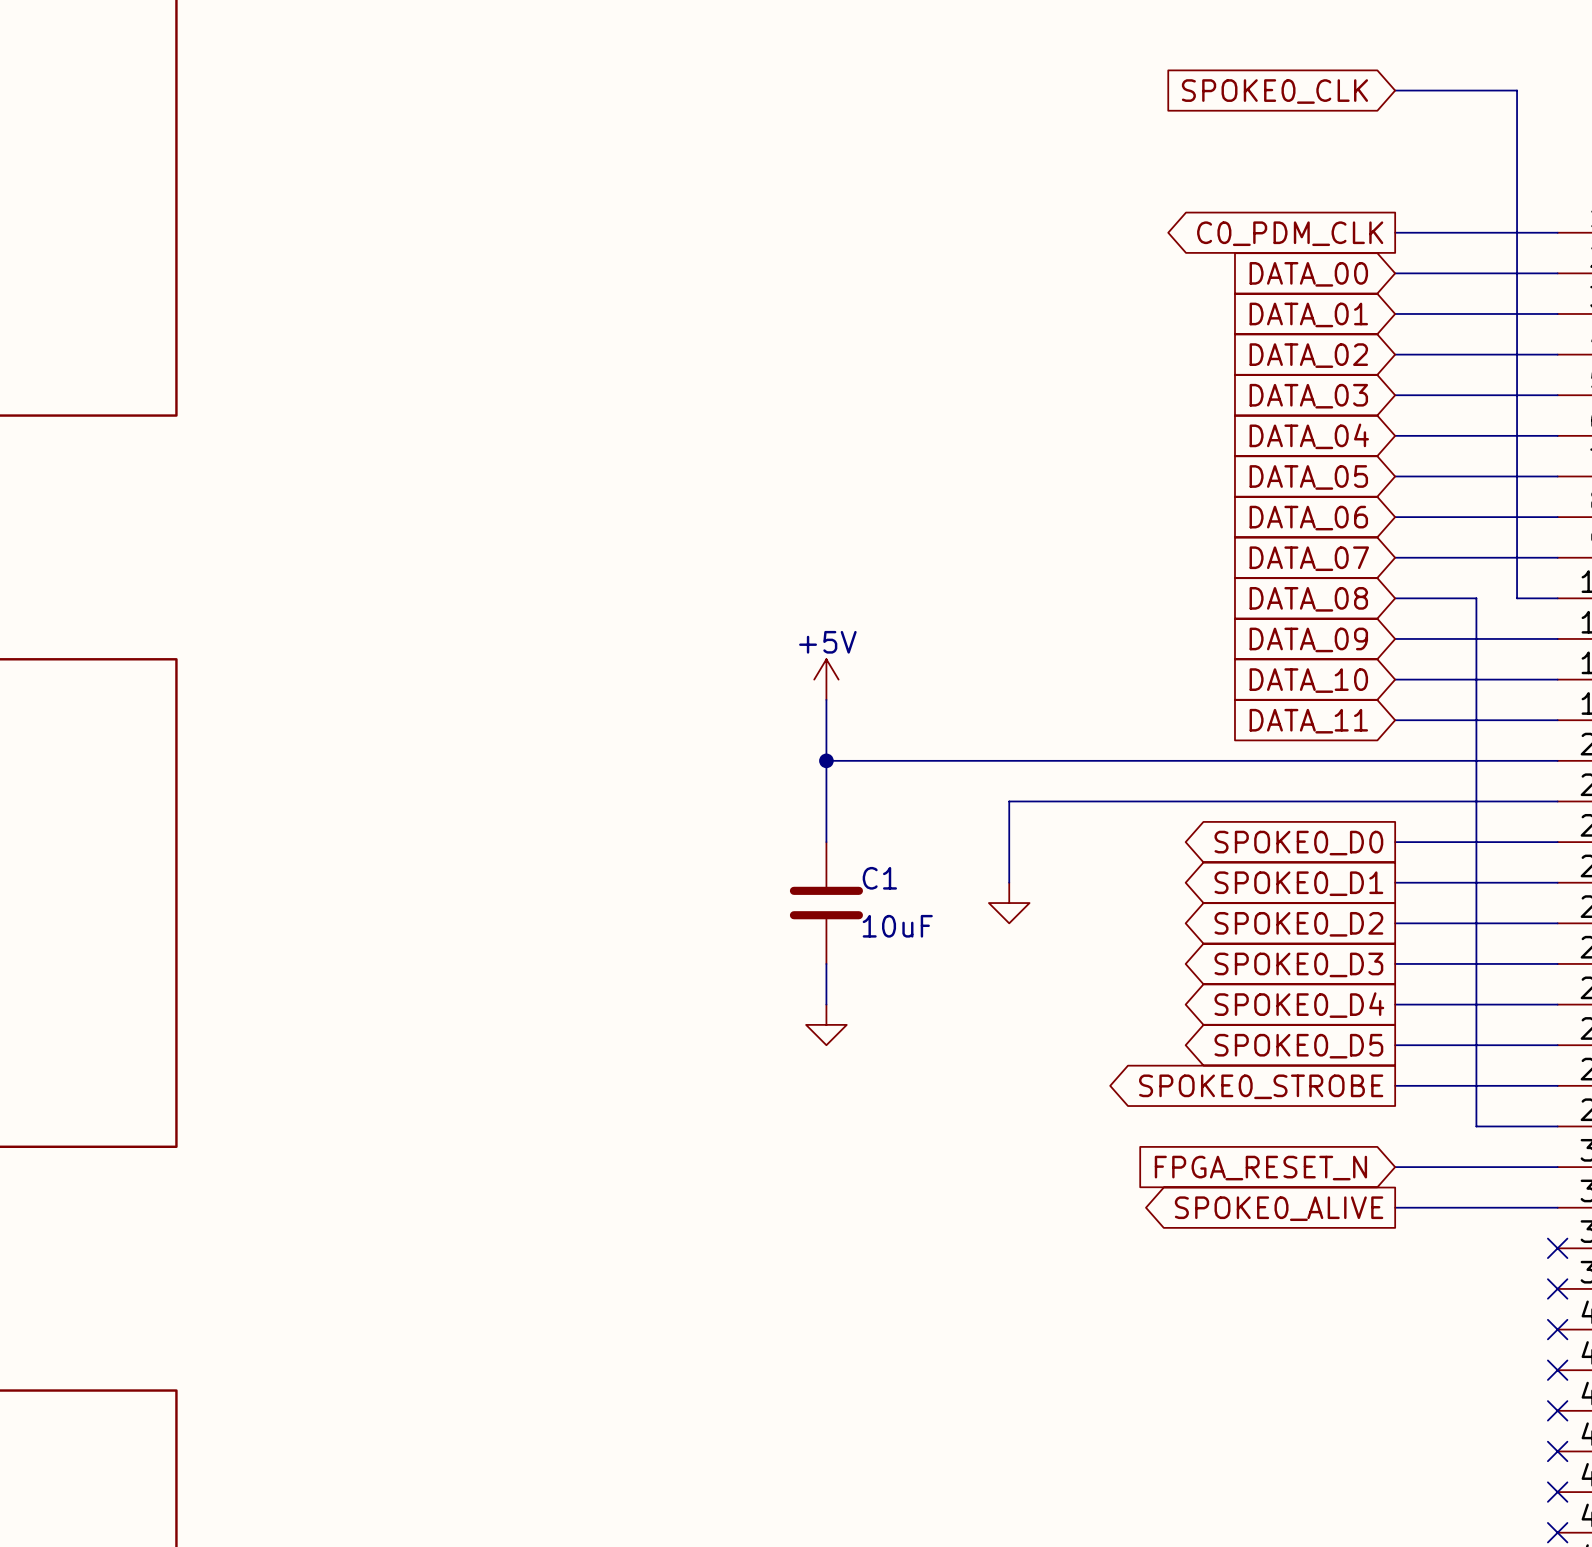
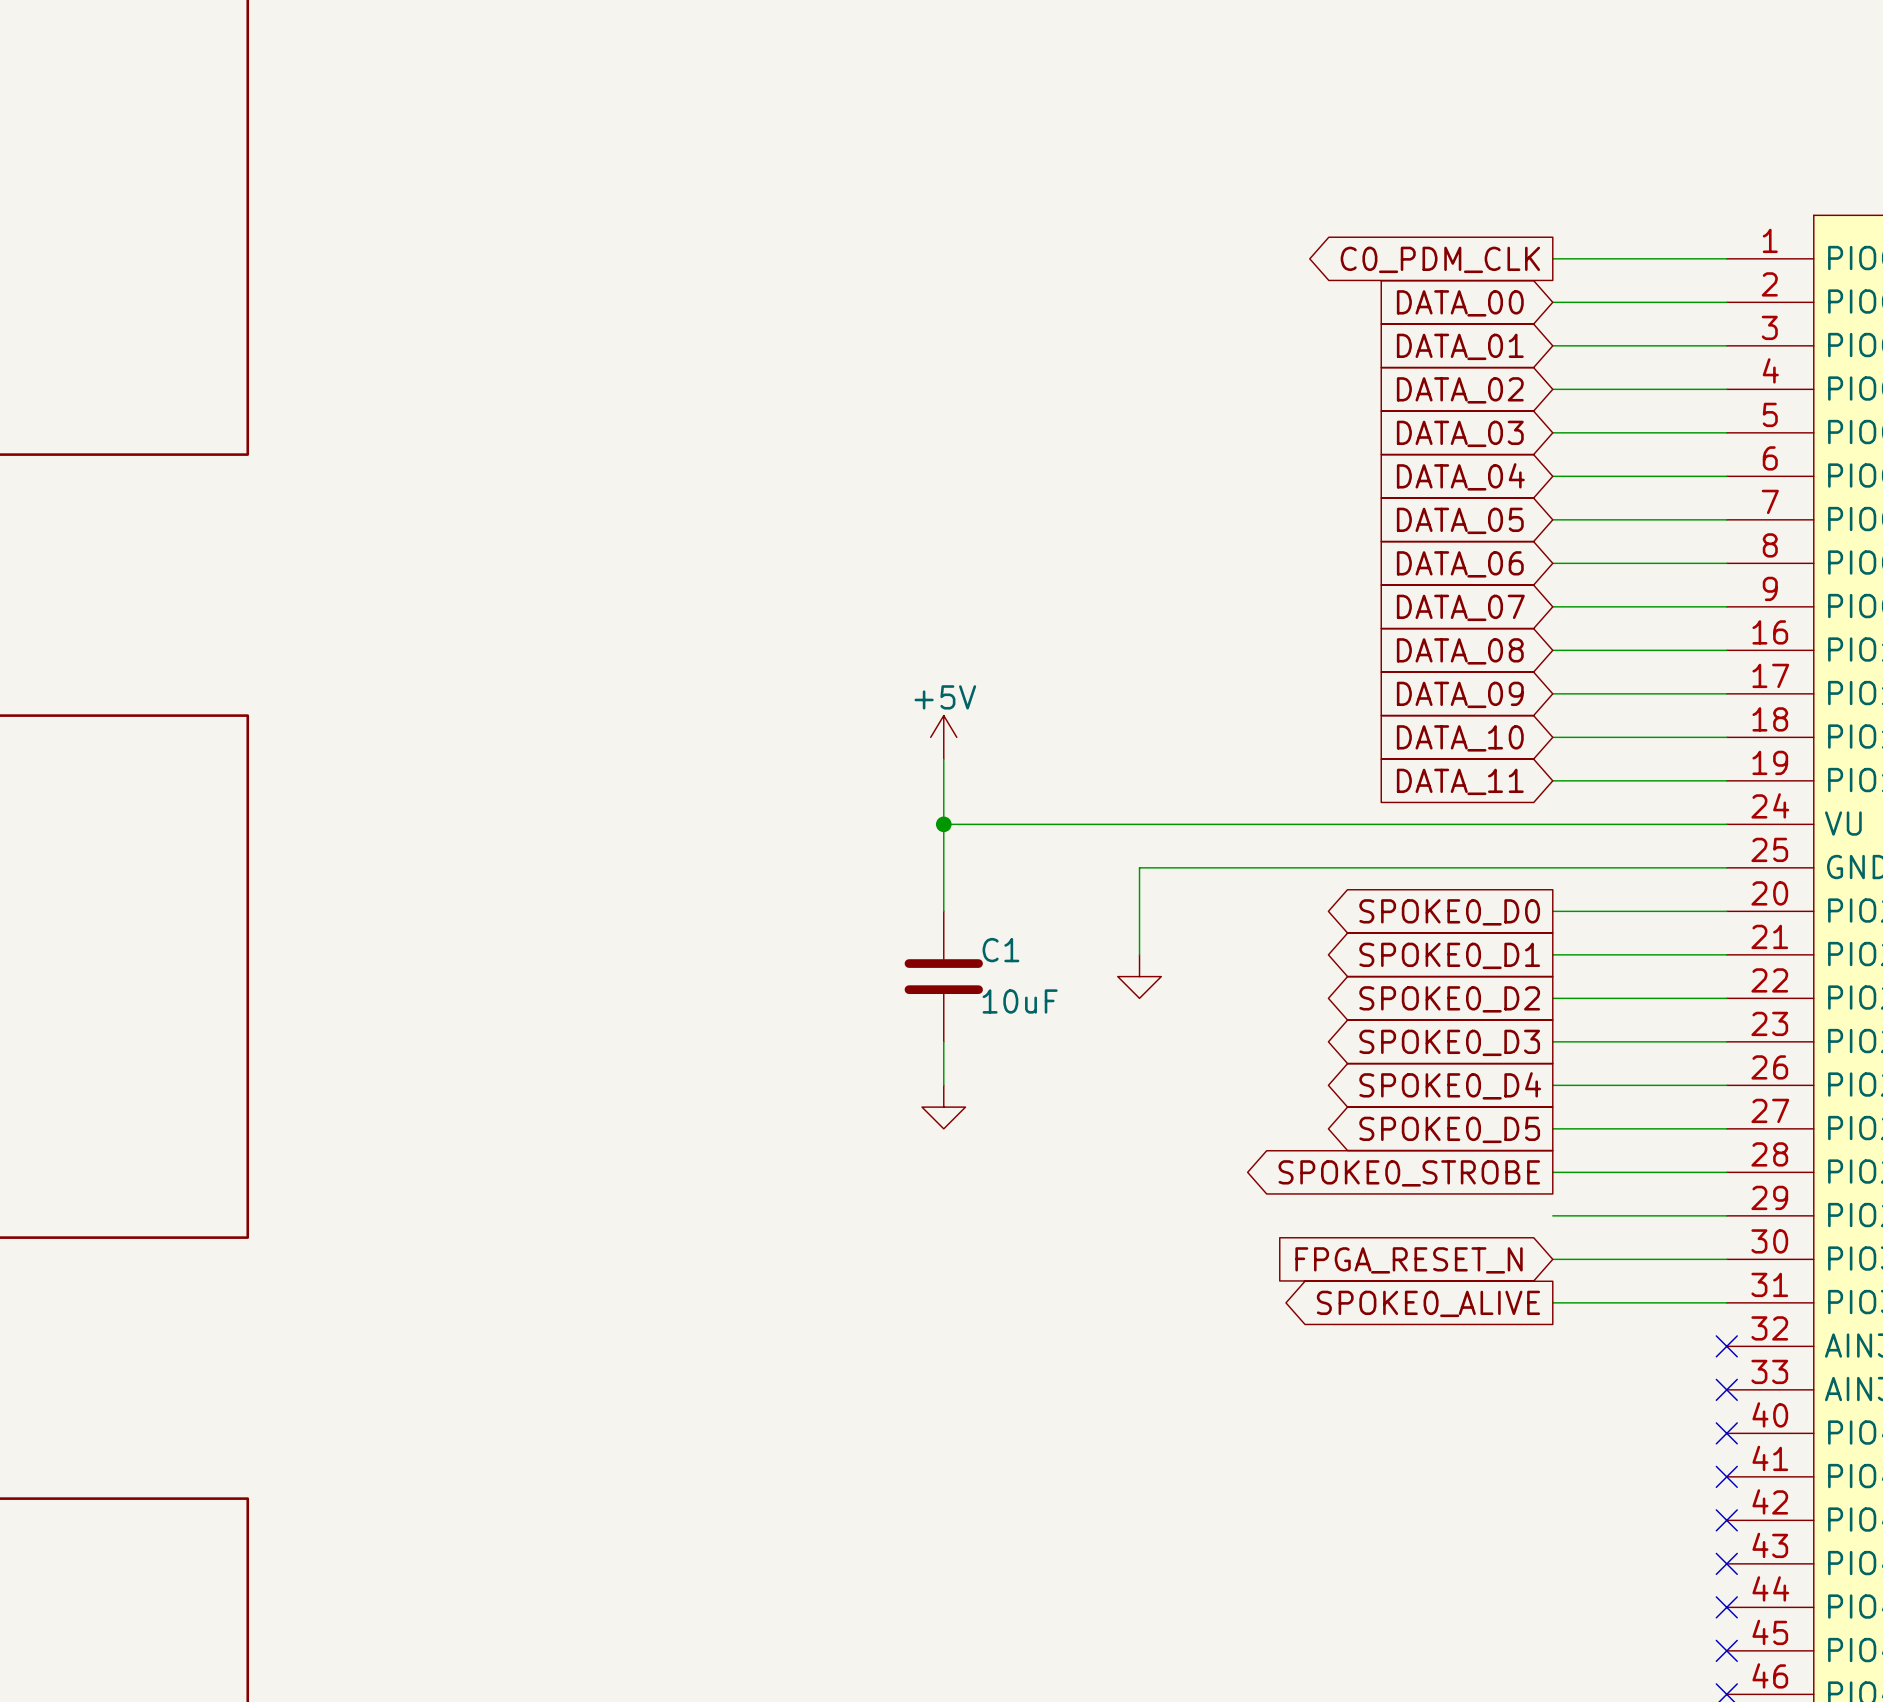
wire: (1395, 90) (1517, 90) (1517, 598) -> (1639, 650) (1683, 650)
global label: SPOKE0_CLK (1274, 91) -> none
wire: (1476, 598) (1476, 1126) -> (1552, 1215) (1639, 1215)

